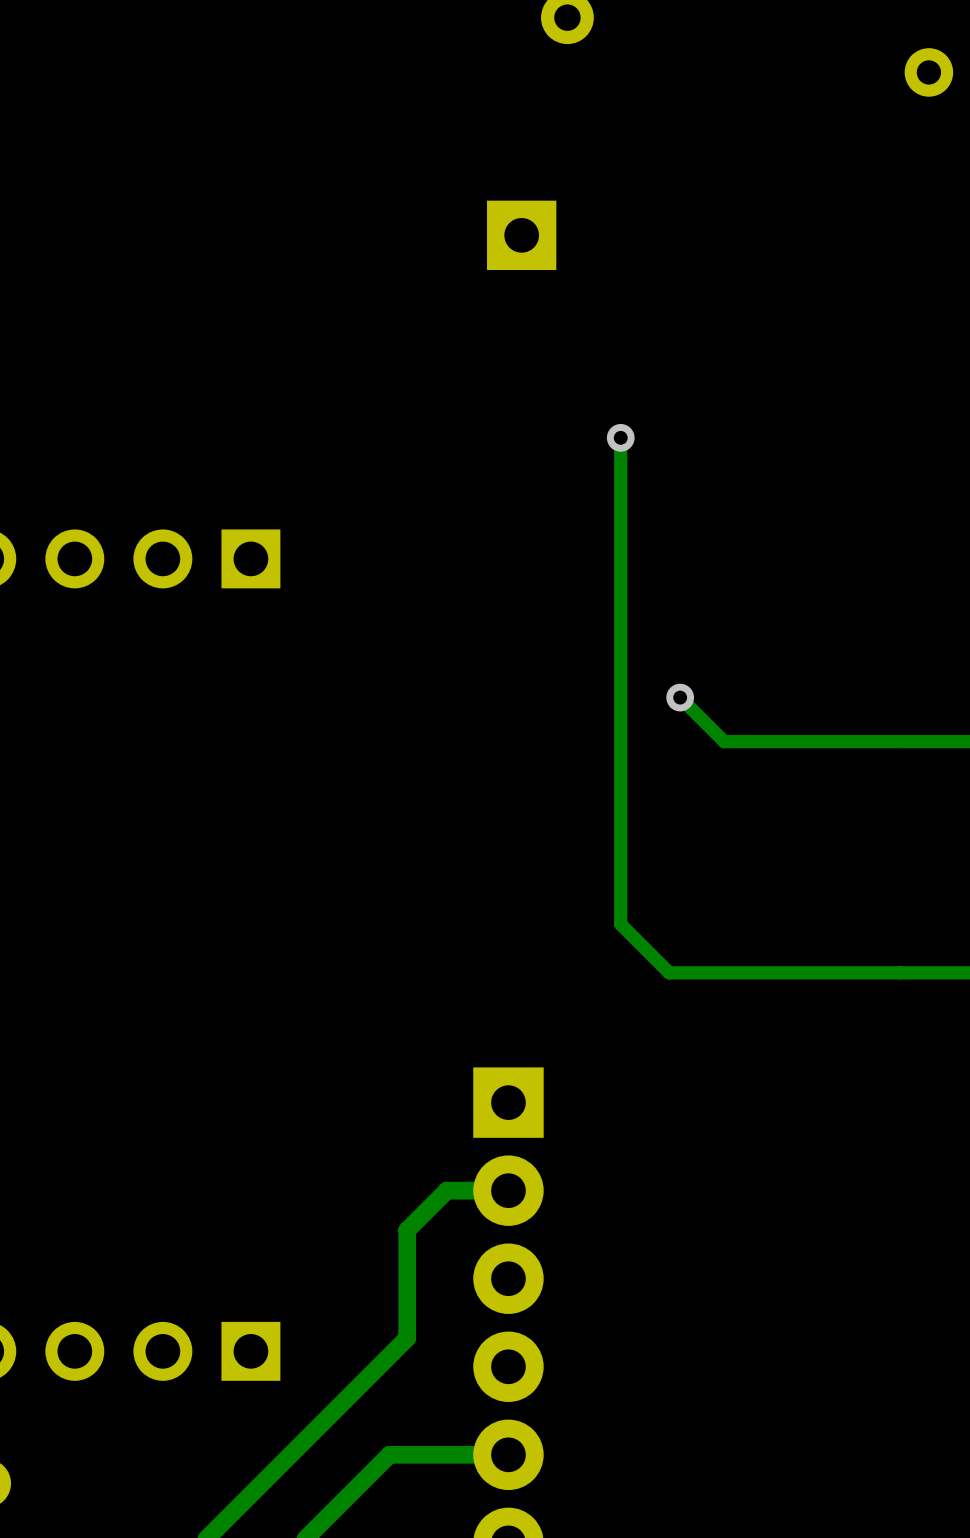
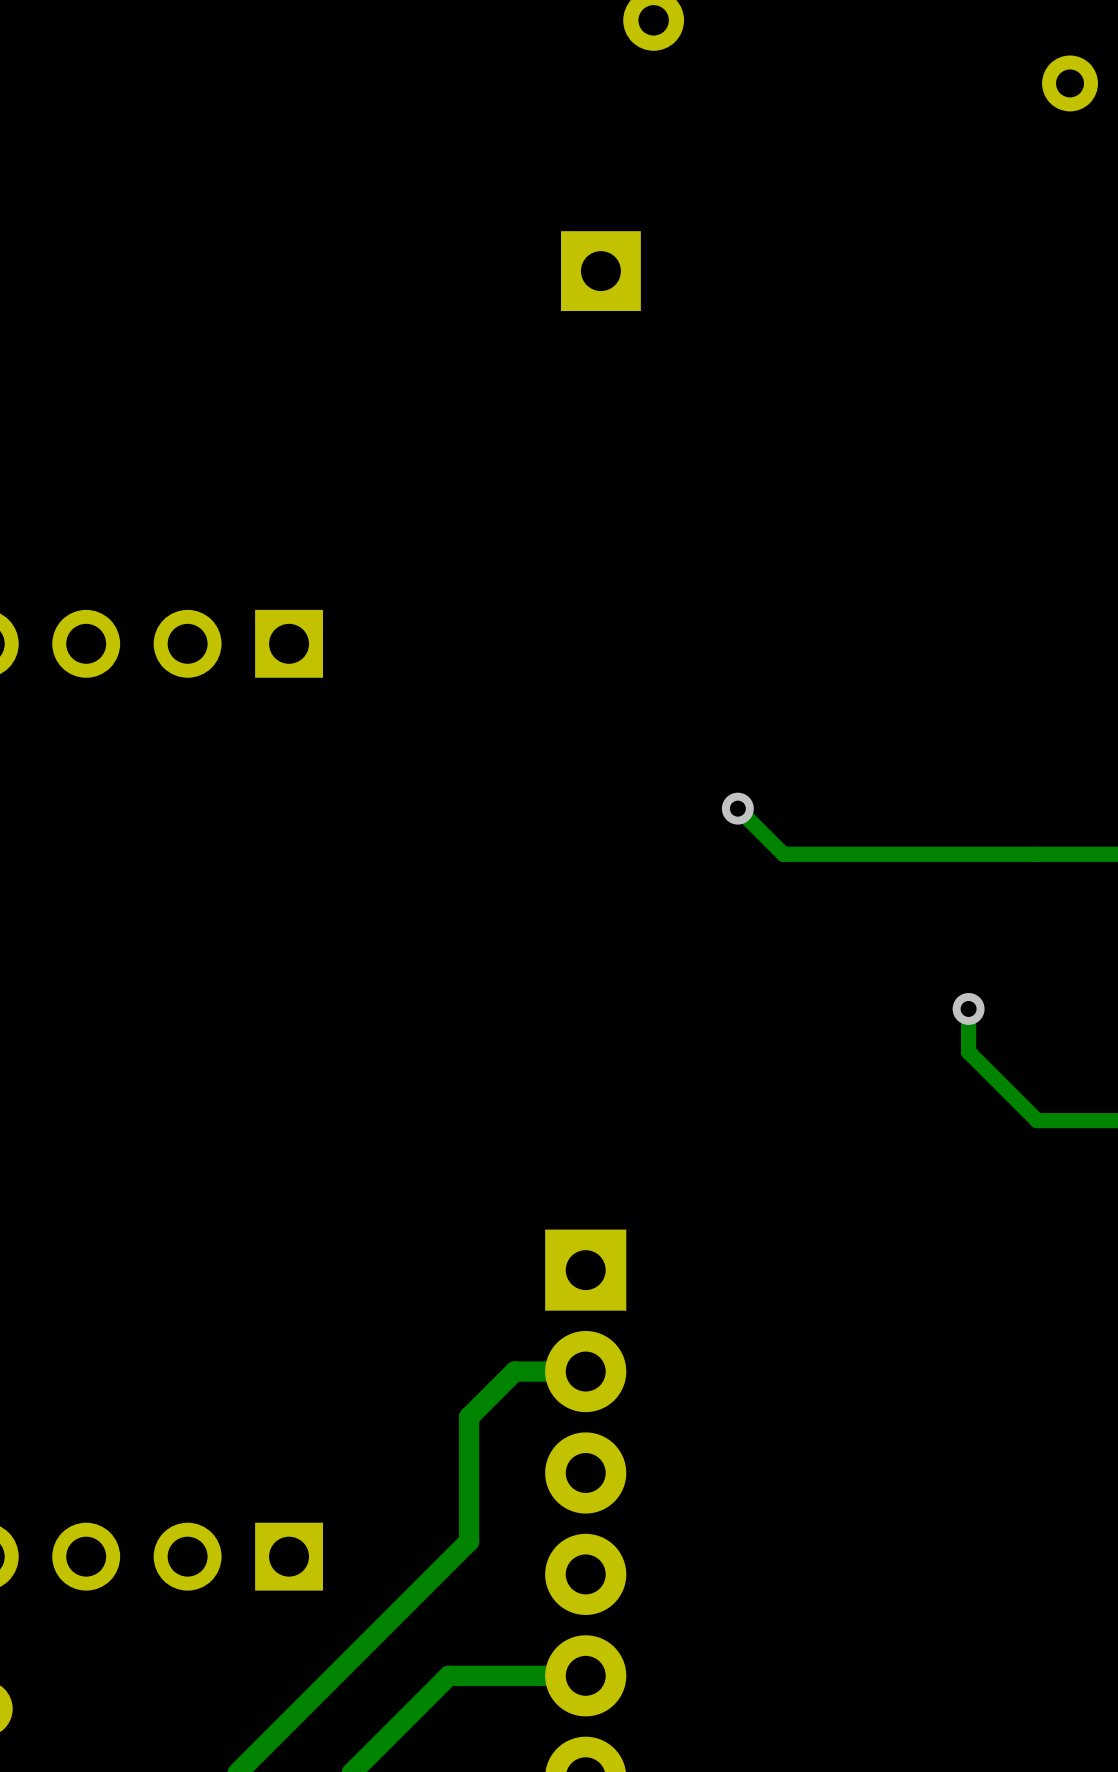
track: (620, 437) (620, 924) (669, 972) (900, 972) -> (968, 1008) (968, 1052) (1037, 1120)
via: (620, 437) -> none
track: (680, 697) (724, 741) -> (737, 808) (783, 854) (834, 854)
via position: (680, 697) -> (737, 808)
via: none -> (968, 1008)

